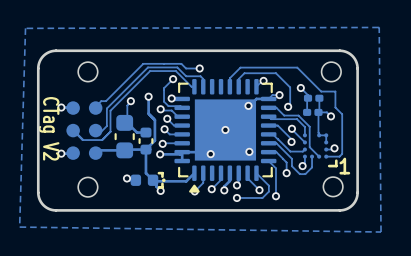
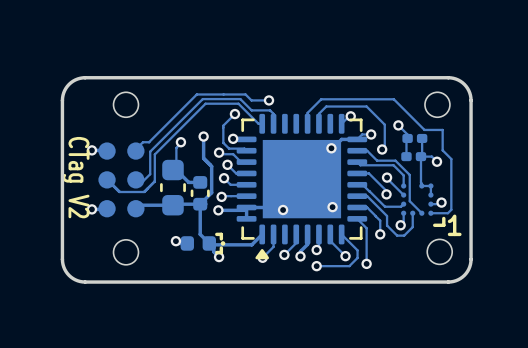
zone outline: (379, 27) (381, 232) (19, 227) (25, 28) (379, 27) -> none
via: (225, 129) -> none

